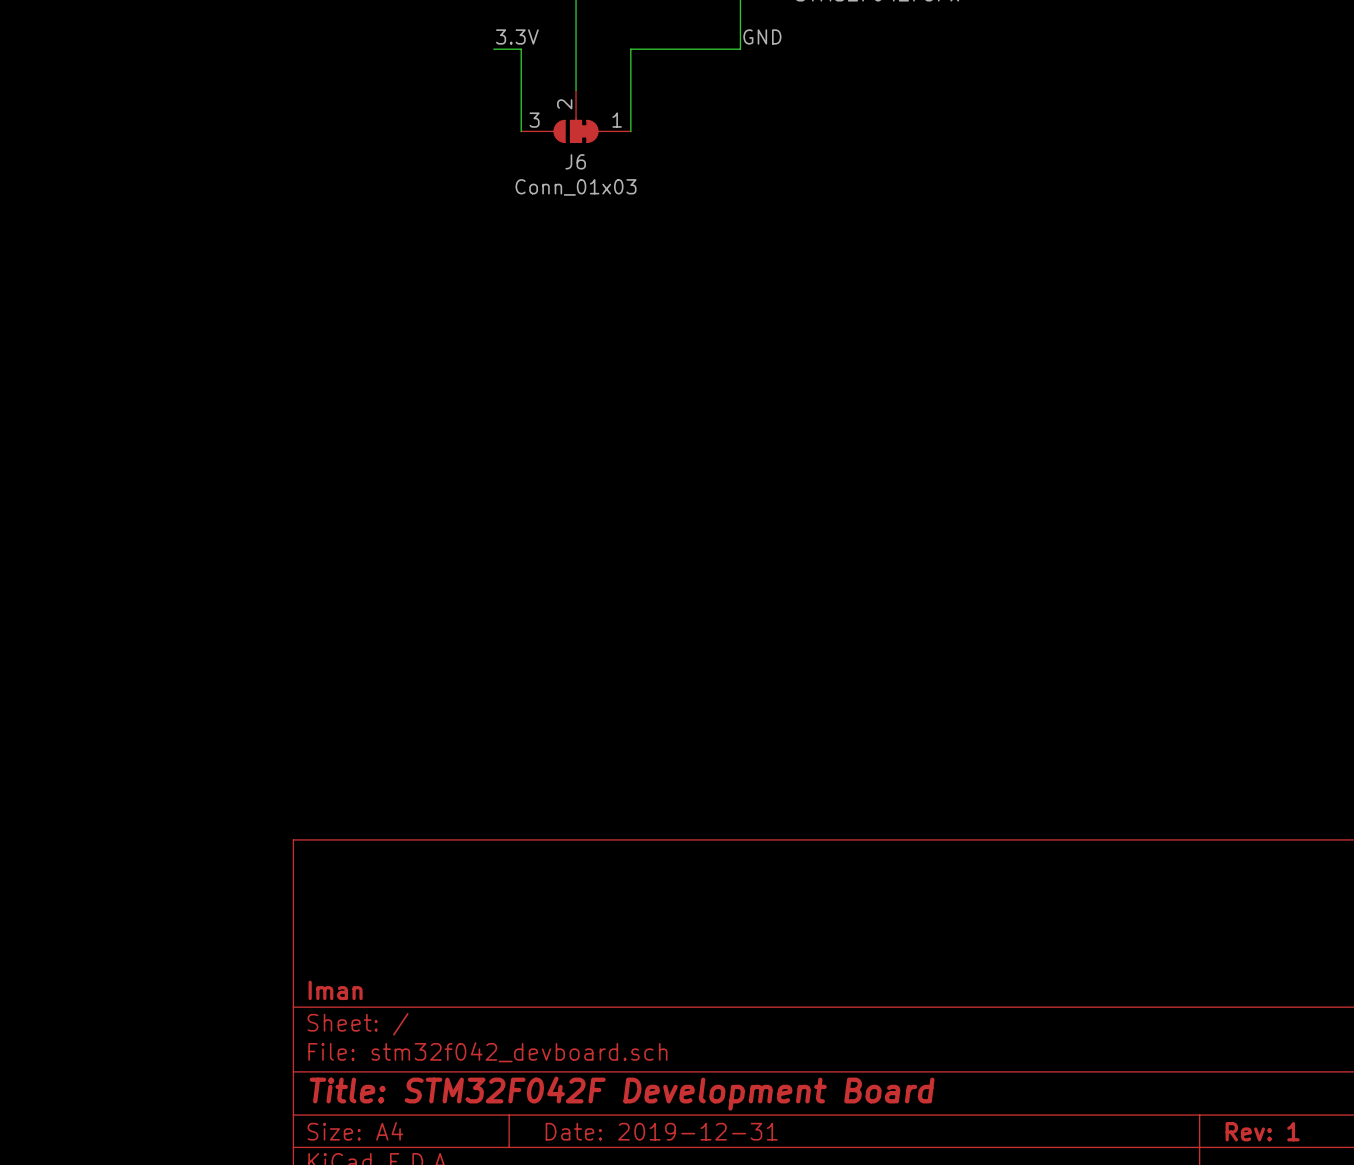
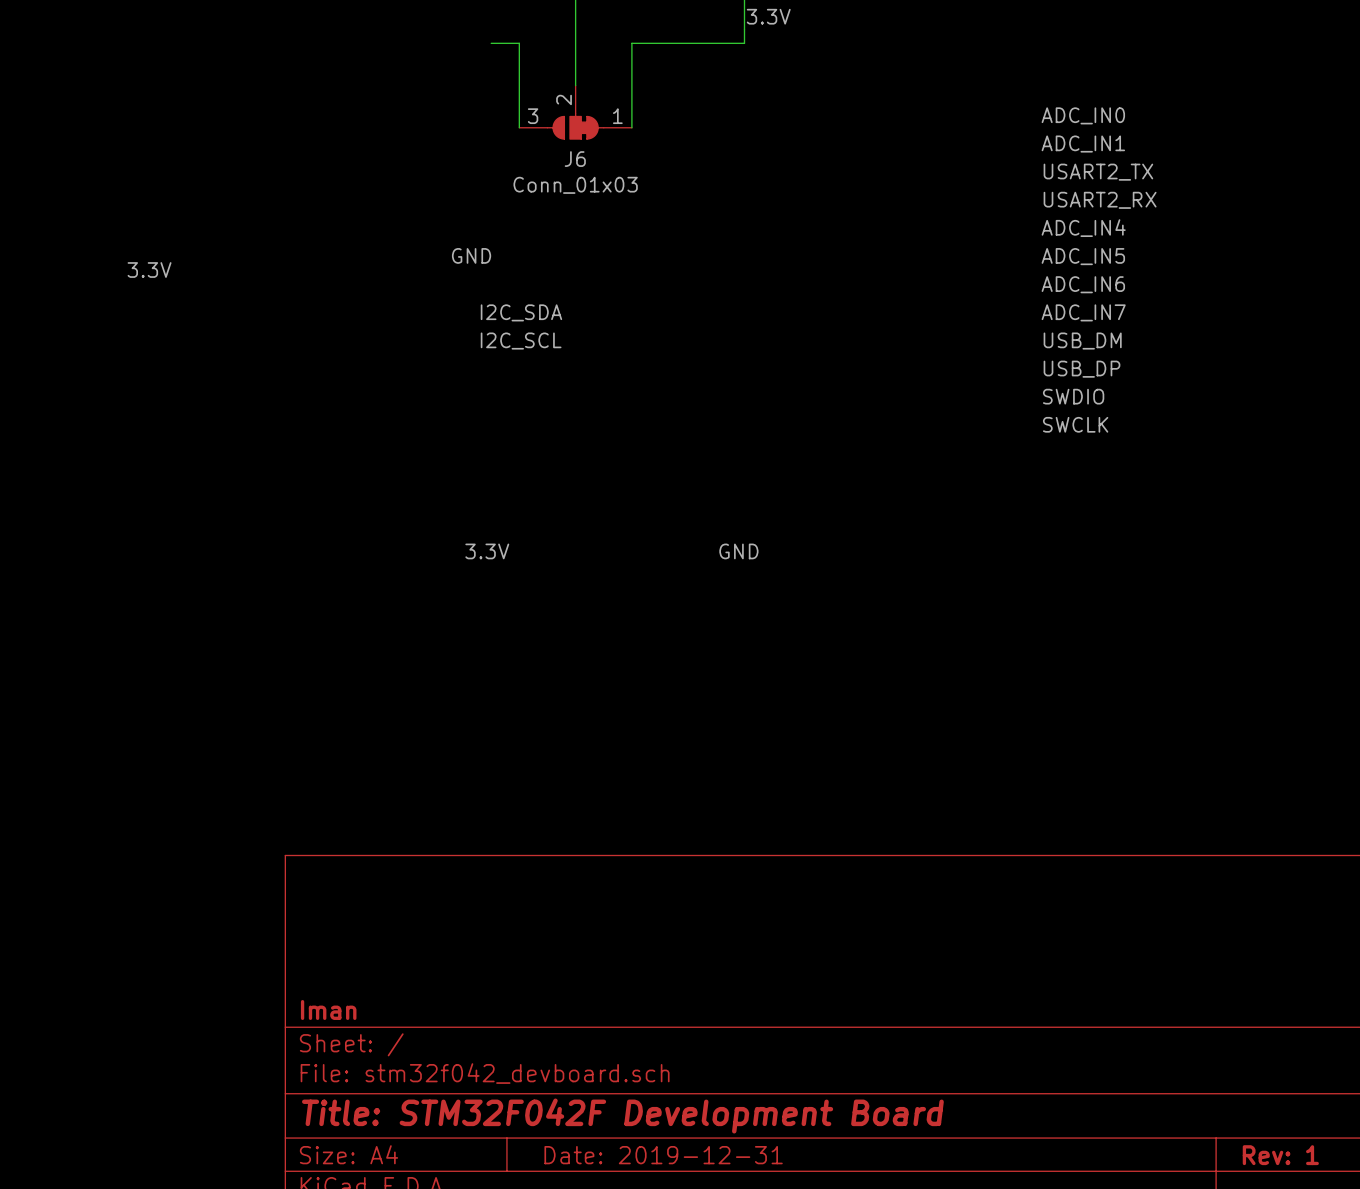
label: none -> 3.3V (768, 16)
label: 3.3V (517, 36) -> none
label: GND (762, 36) -> none
label: none -> ADC_IN0 (1083, 115)
label: none -> ADC_IN1 (1083, 144)
label: none -> USART2_TX (1098, 172)
label: none -> USART2_RX (1100, 200)
label: none -> ADC_IN4 (1083, 228)
label: none -> GND (471, 255)
label: none -> ADC_IN5 (1083, 256)
label: none -> 3.3V (149, 270)
label: none -> ADC_IN6 (1083, 284)
label: none -> I2C_SDA (521, 312)
label: none -> ADC_IN7 (1083, 312)
label: none -> I2C_SCL (521, 341)
label: none -> USB_DM (1082, 341)
label: none -> USB_DP (1081, 369)
label: none -> SWDIO (1073, 396)
label: none -> SWCLK (1075, 424)
label: none -> 3.3V (487, 551)
label: none -> GND (738, 551)

